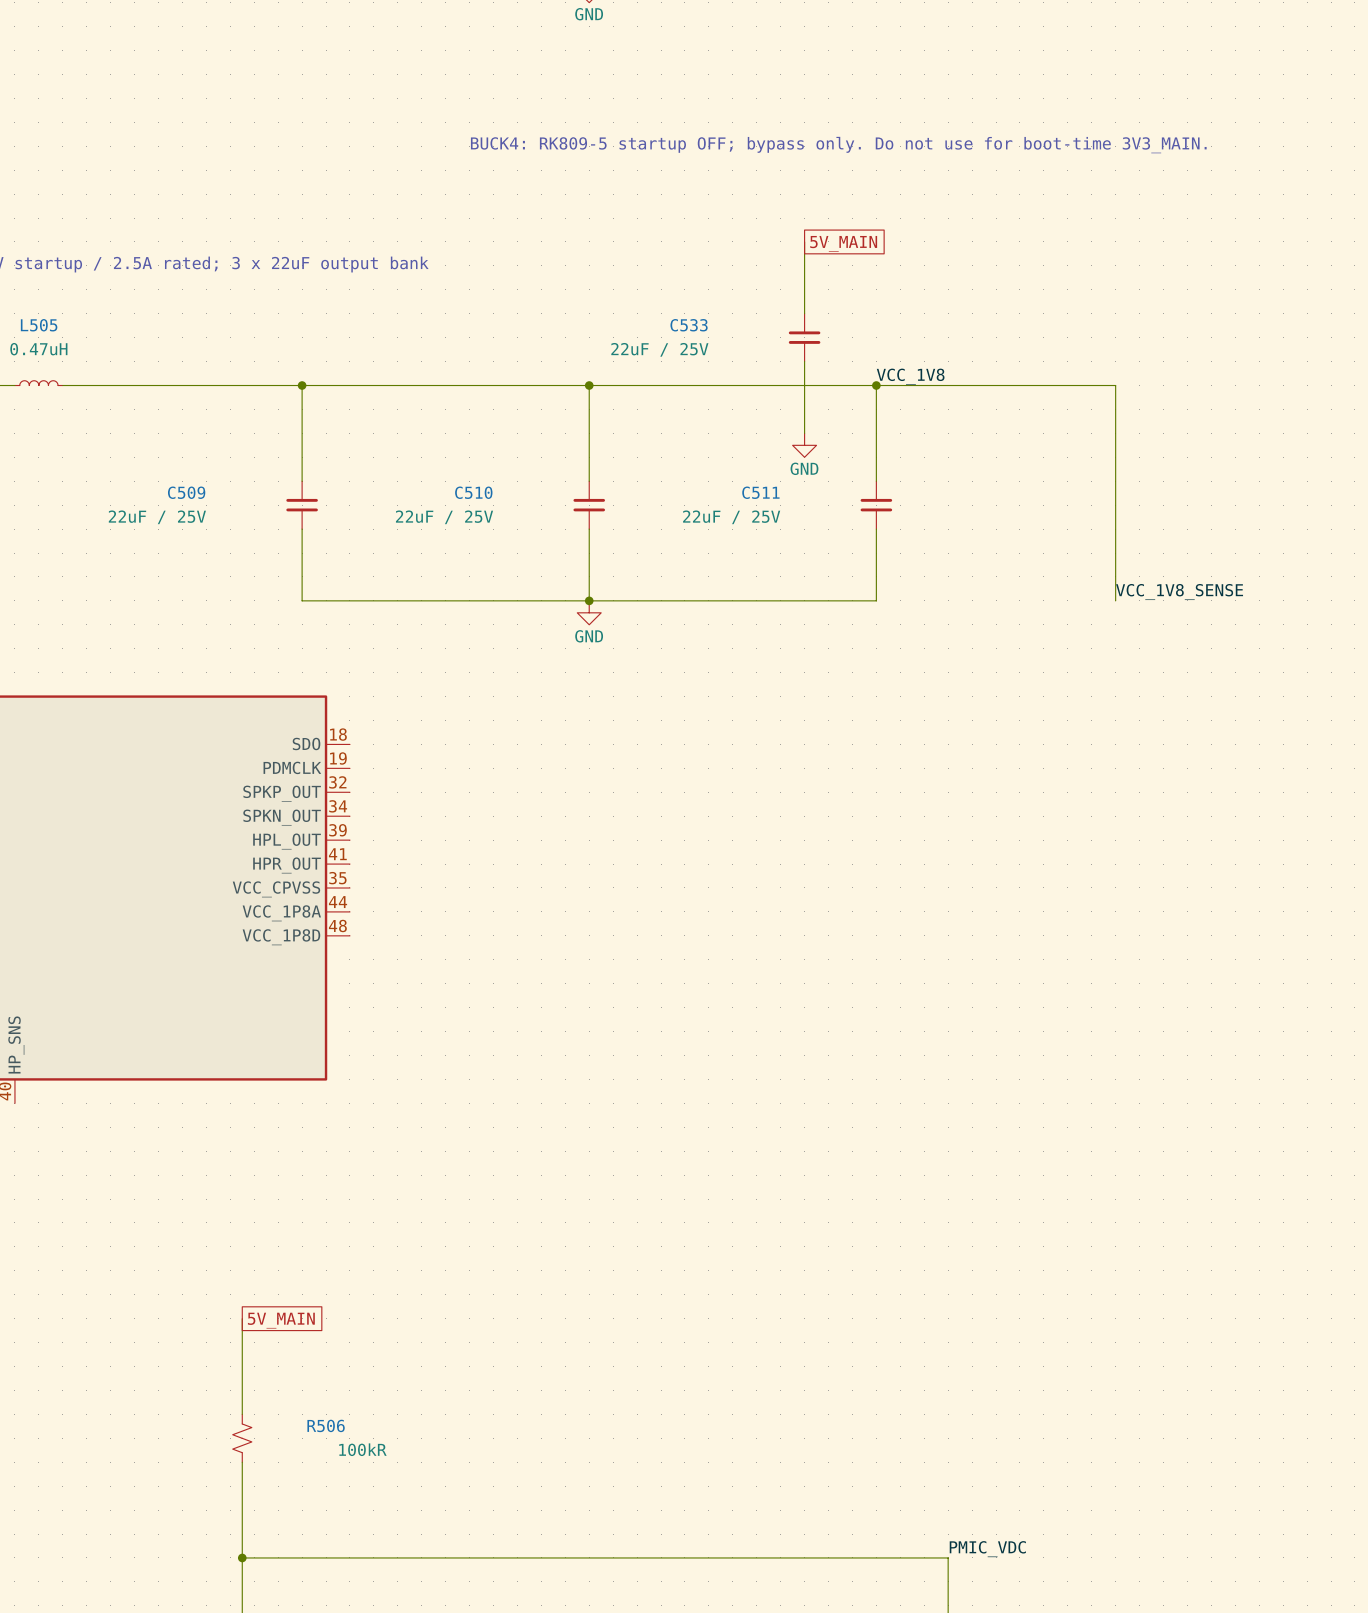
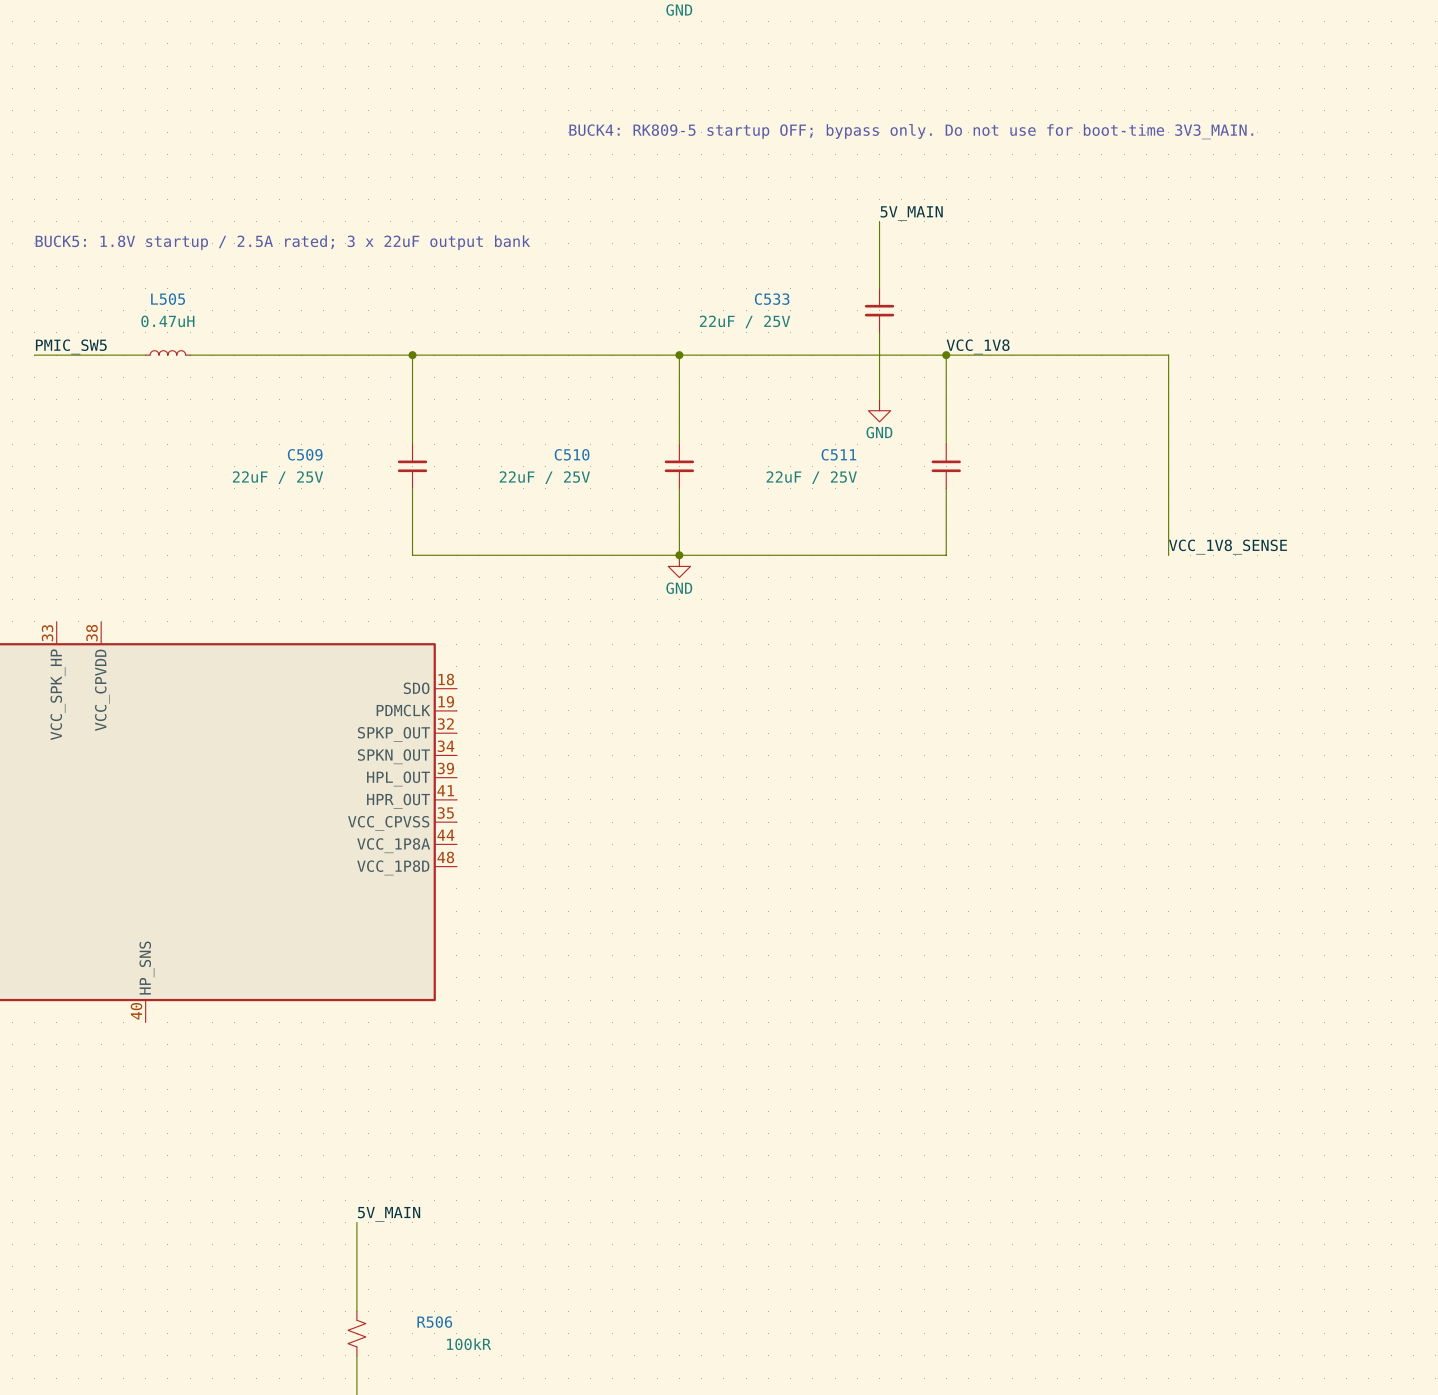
label: none -> 5V_MAIN (911, 213)
global label: 5V_MAIN (843, 243) -> none
label: none -> 5V_MAIN (389, 1214)
global label: 5V_MAIN (281, 1320) -> none

